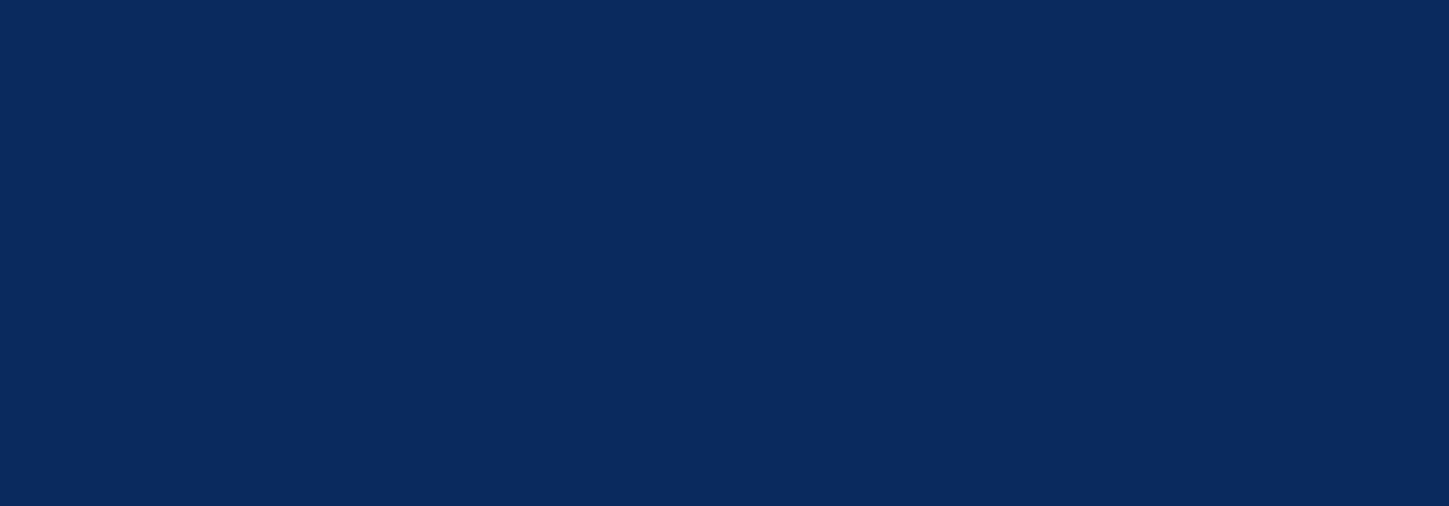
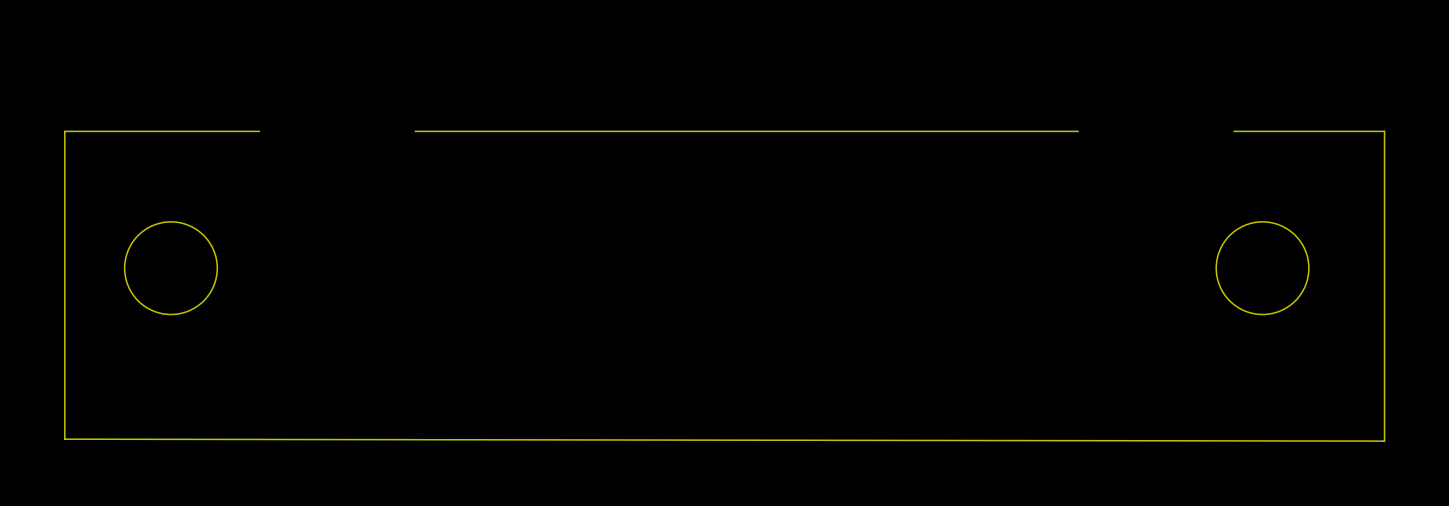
board edge: none -> (259, 131) (64, 131) (64, 439) (1384, 441) (1384, 131) (1234, 131)
board edge: none -> (415, 131) (1078, 131)
round board edge: none -> [123, 221, 219, 316]
round board edge: none -> [1215, 221, 1310, 316]

